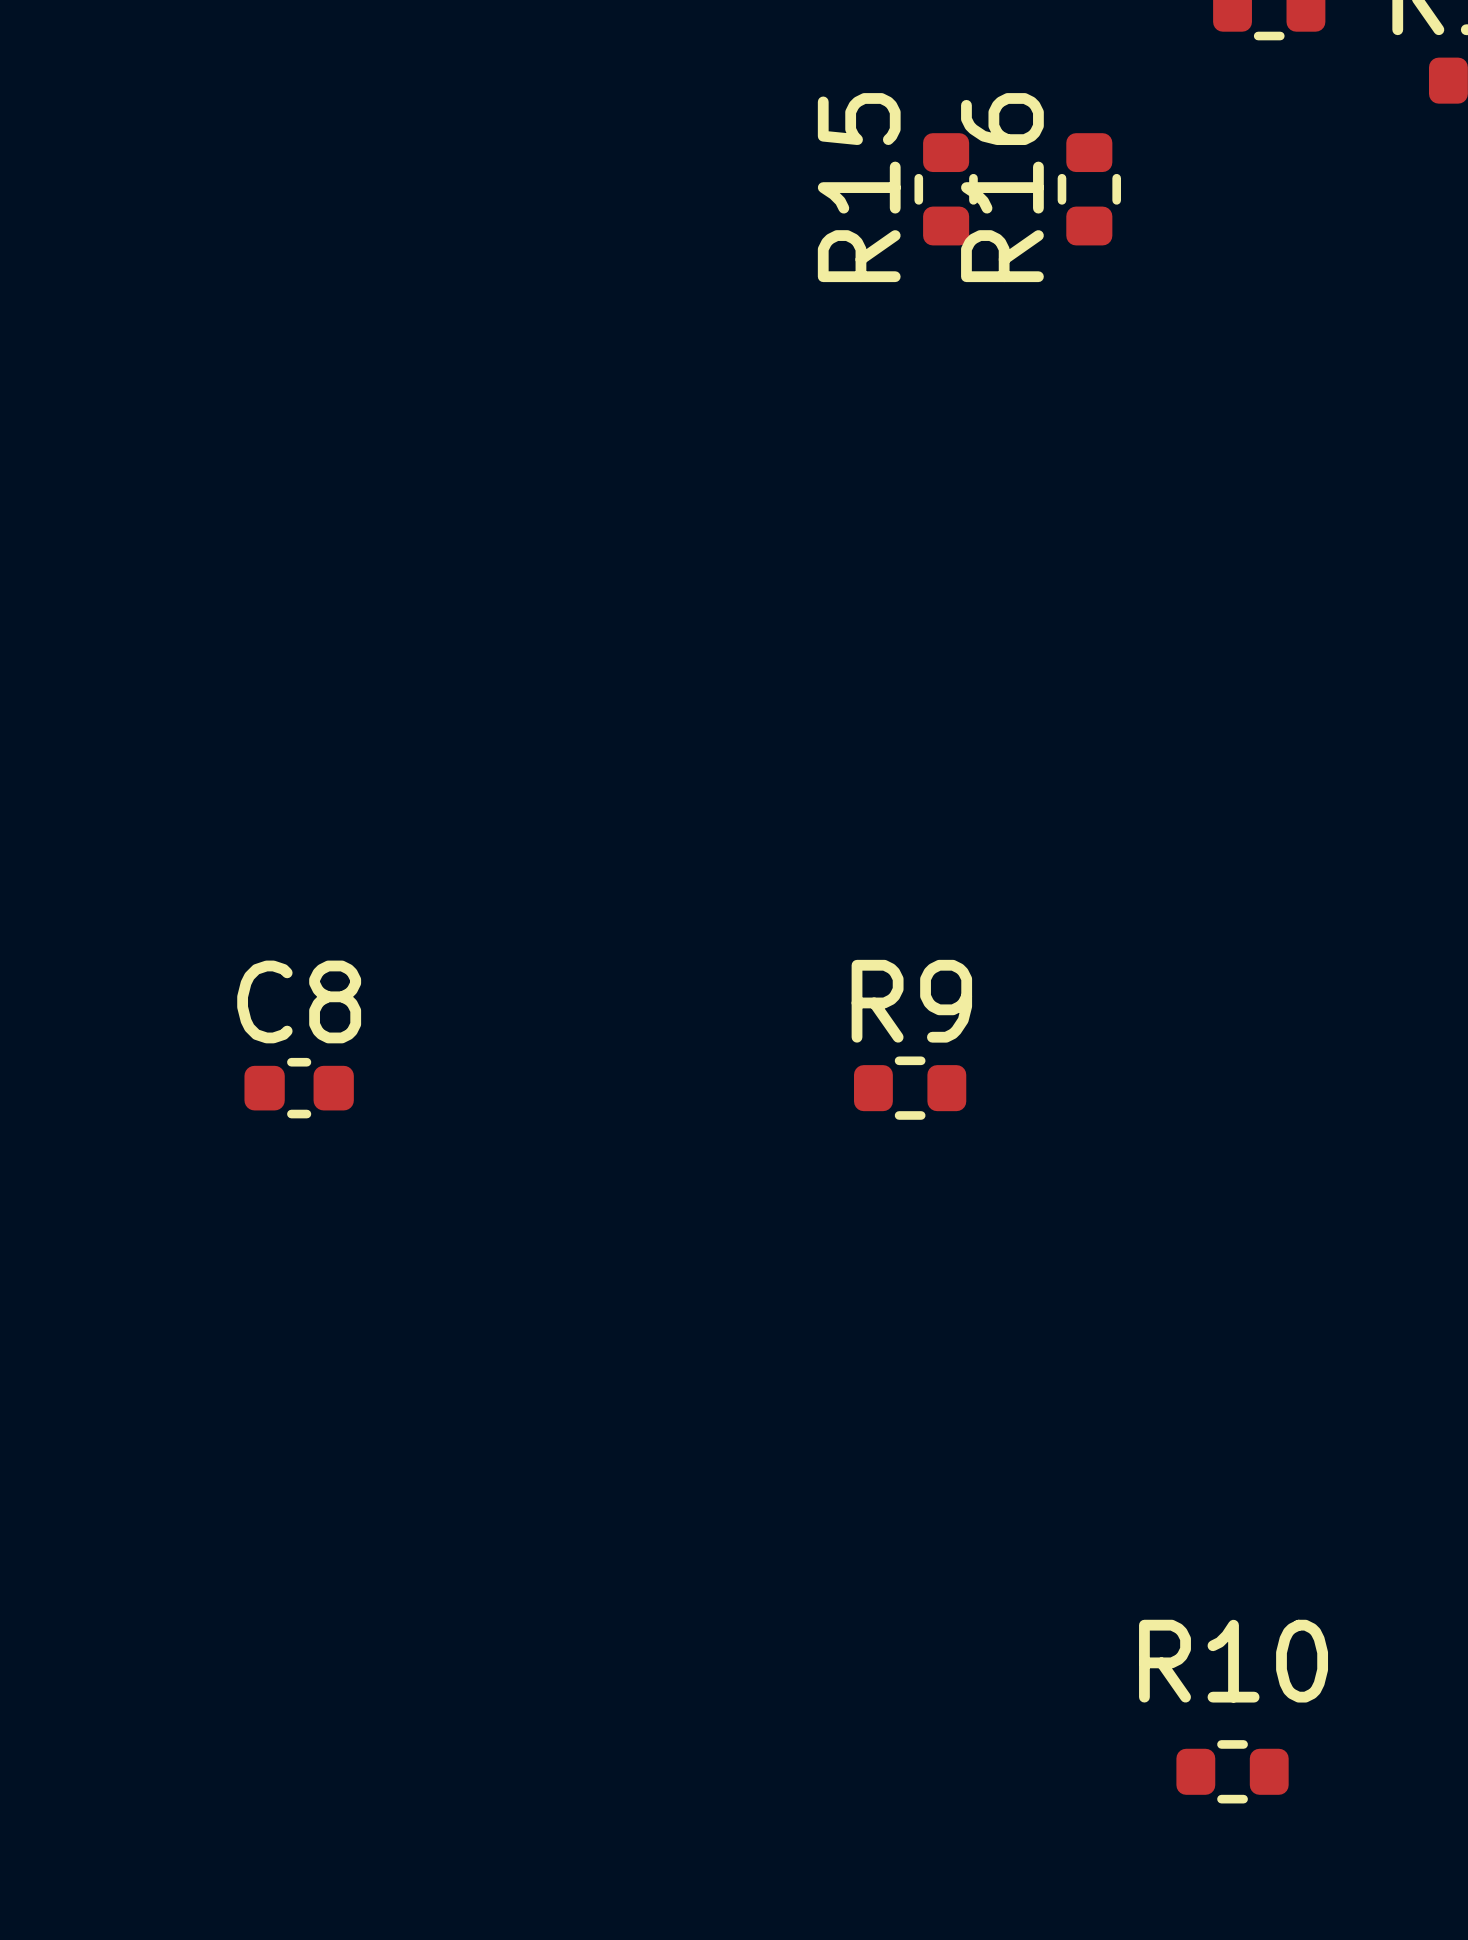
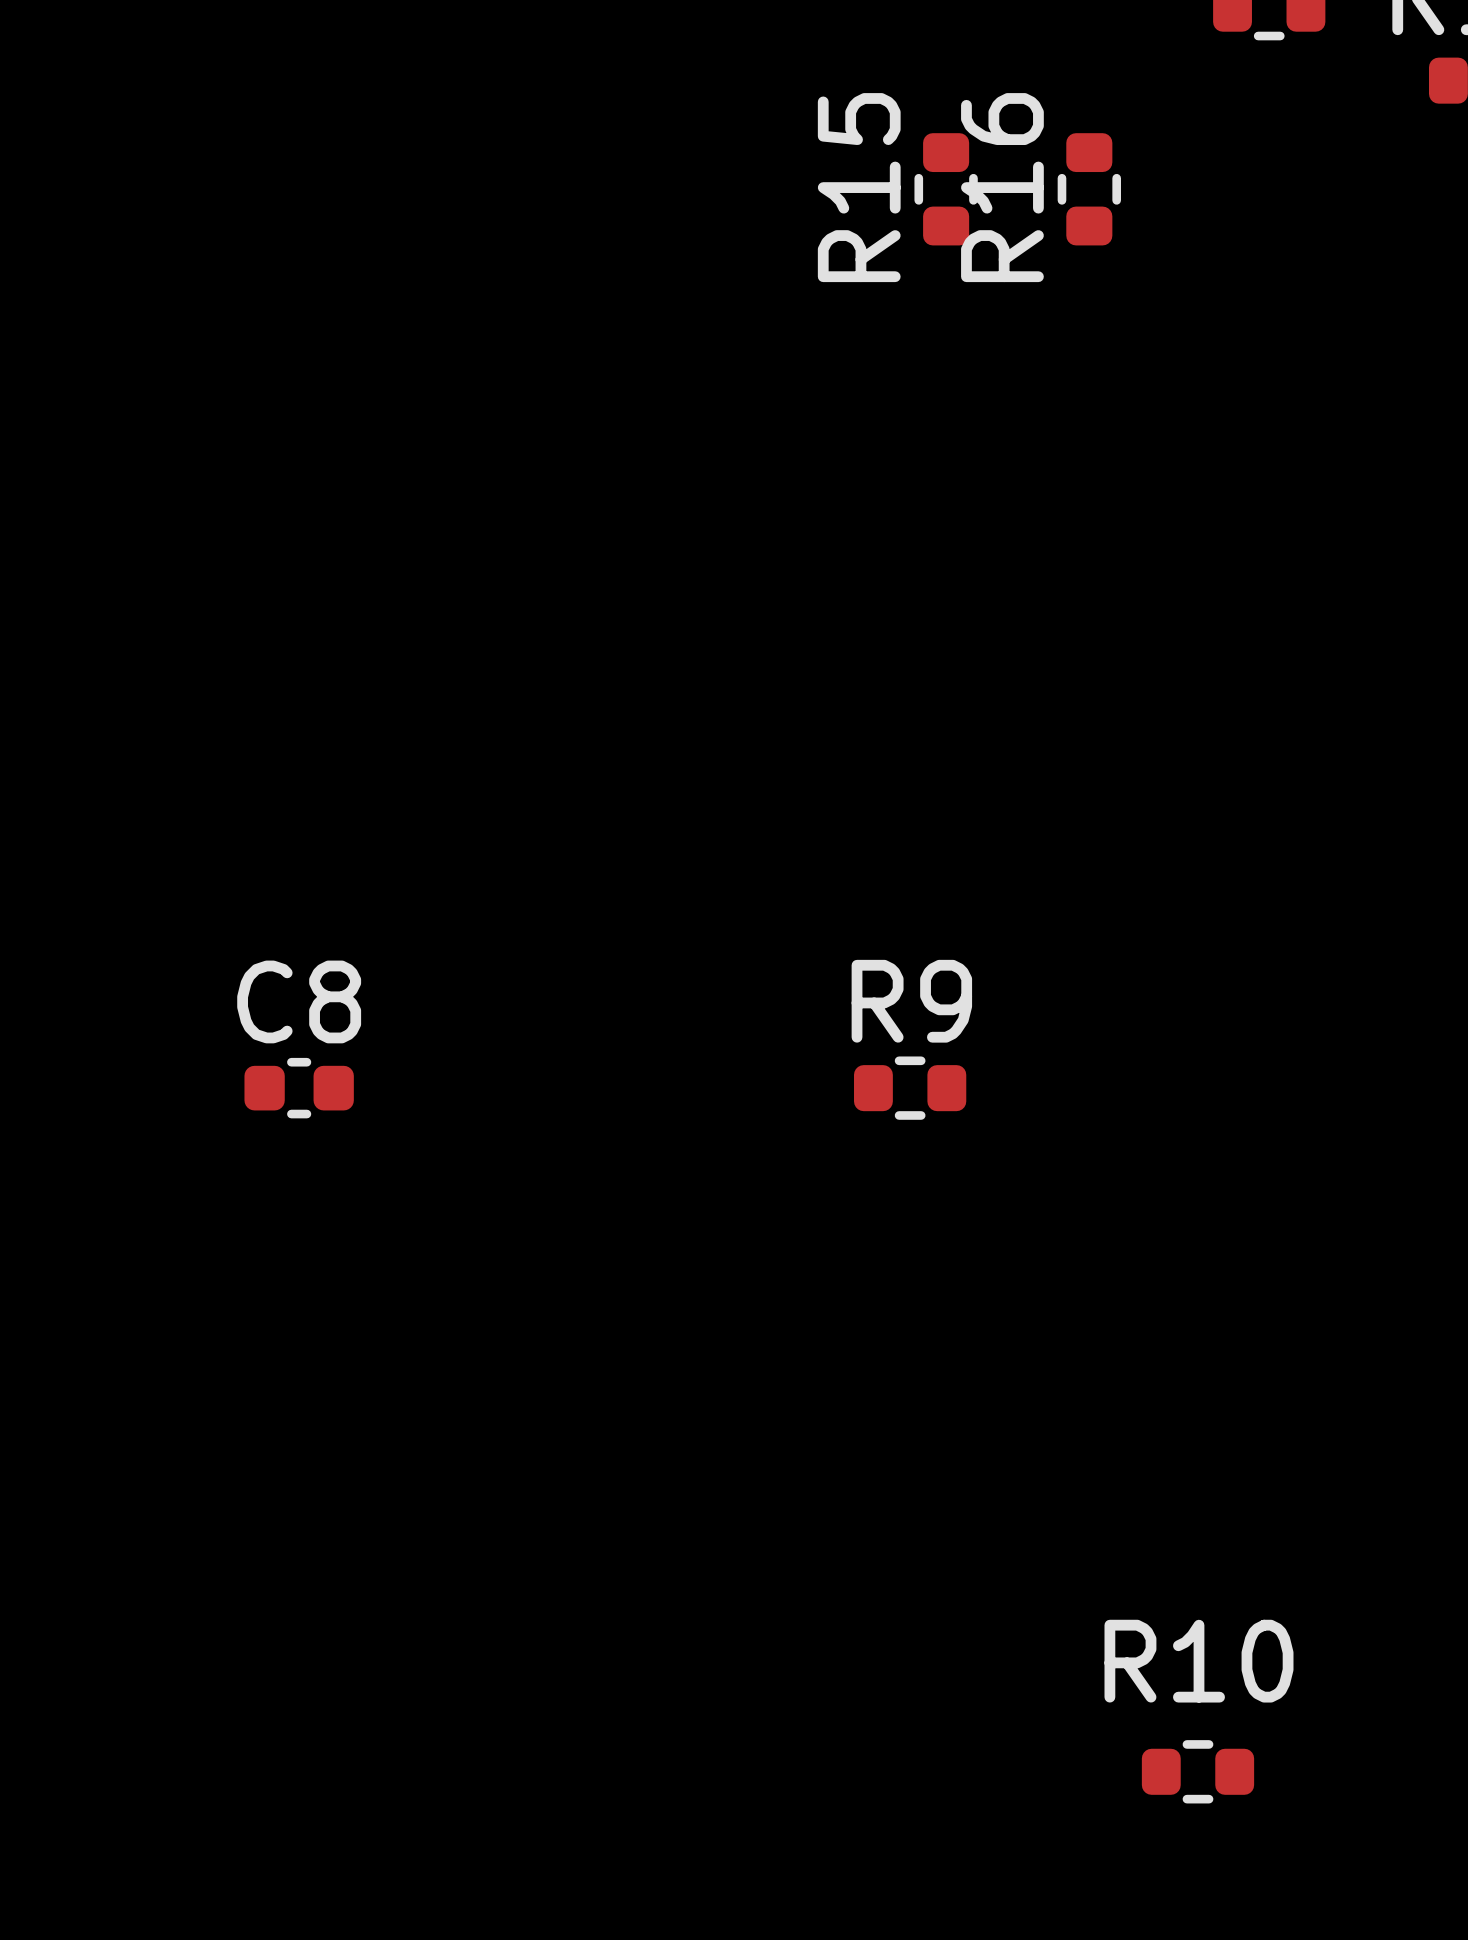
R10 position: (1232, 1771) -> (1197, 1771)

